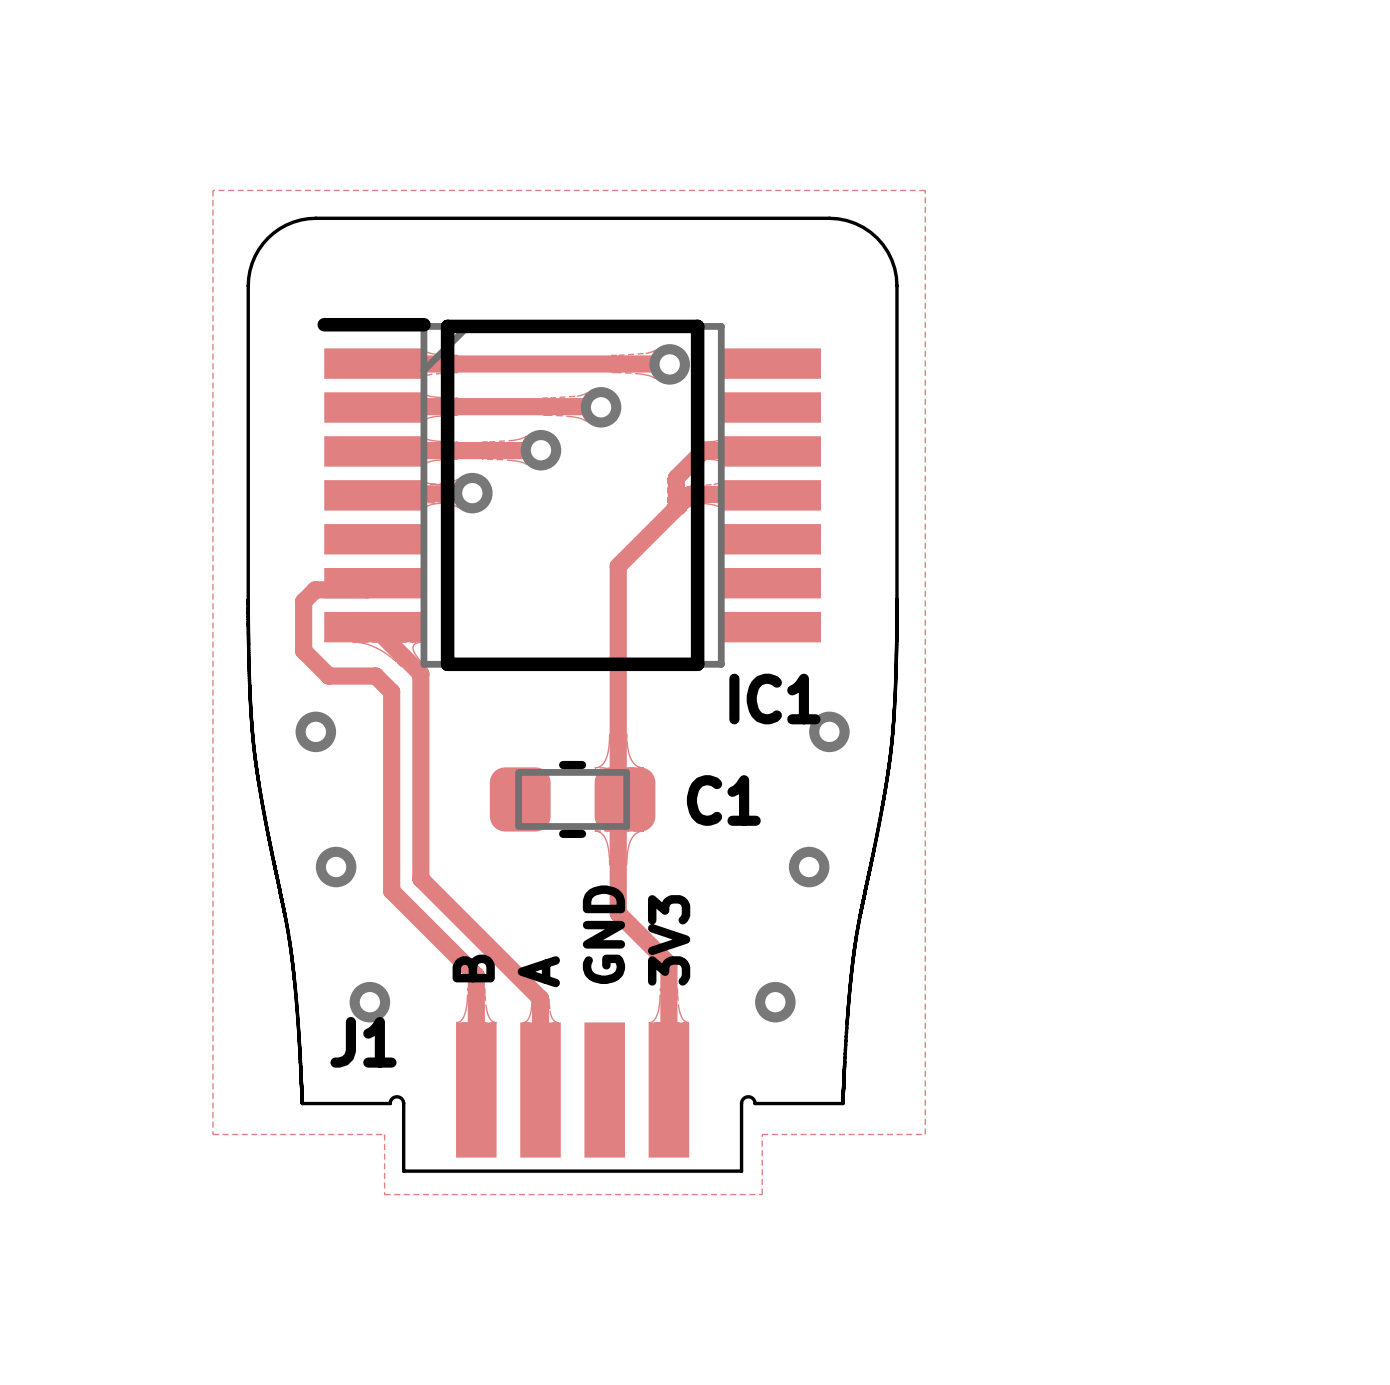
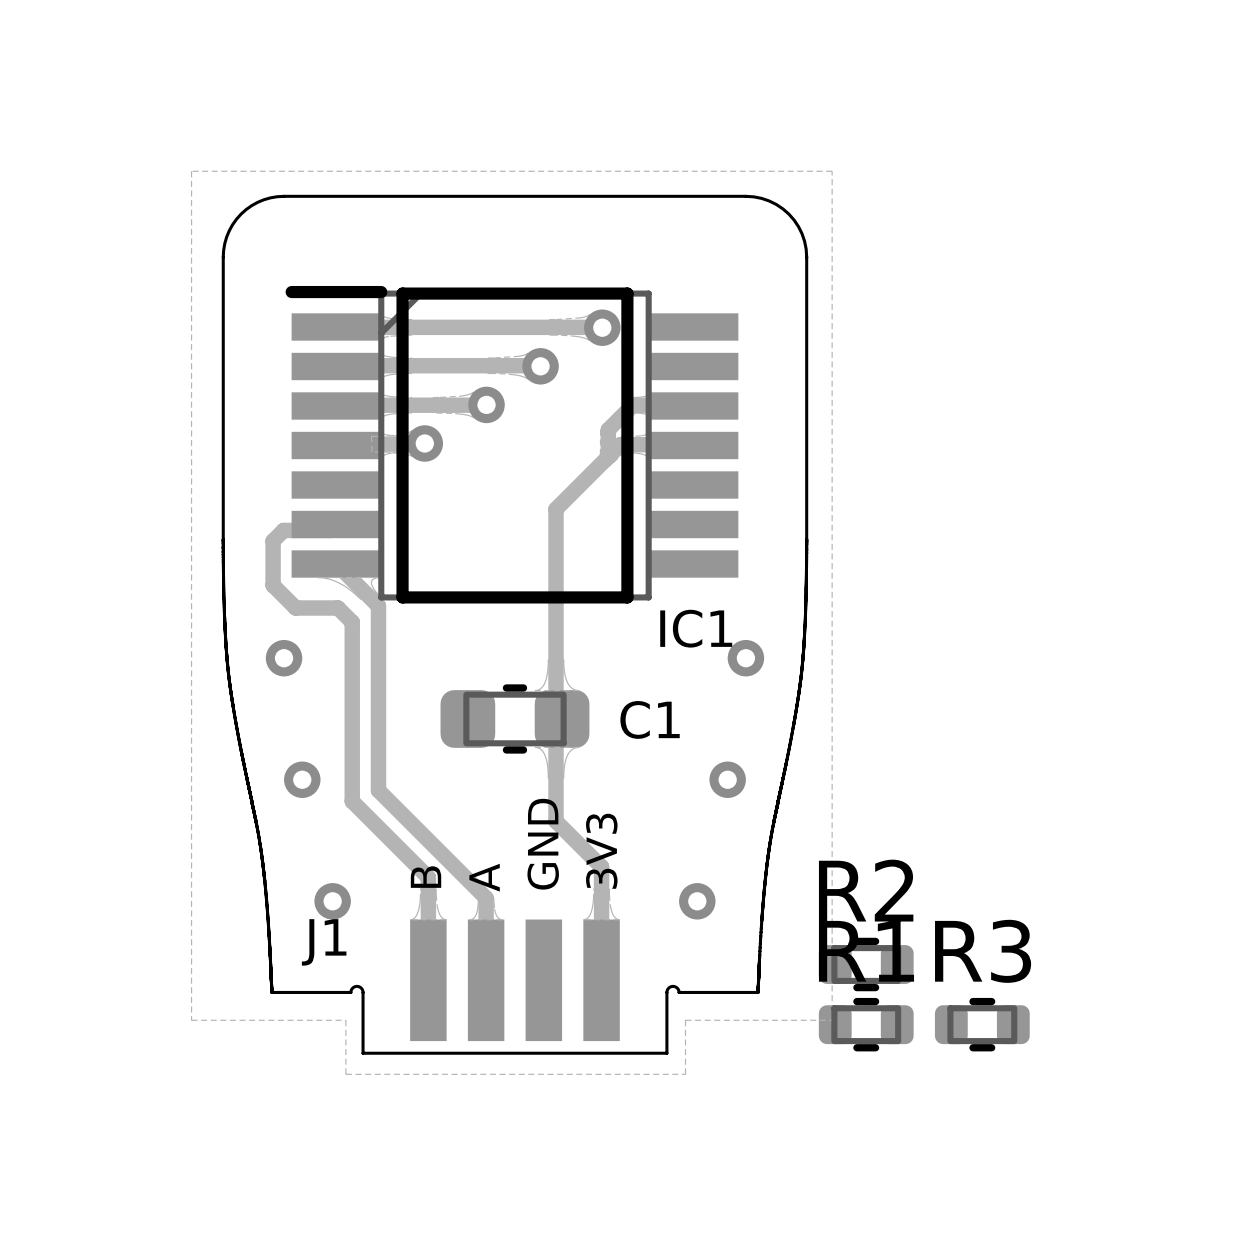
R2: none -> (866, 964)
R1: none -> (866, 1024)
R3: none -> (982, 1024)

